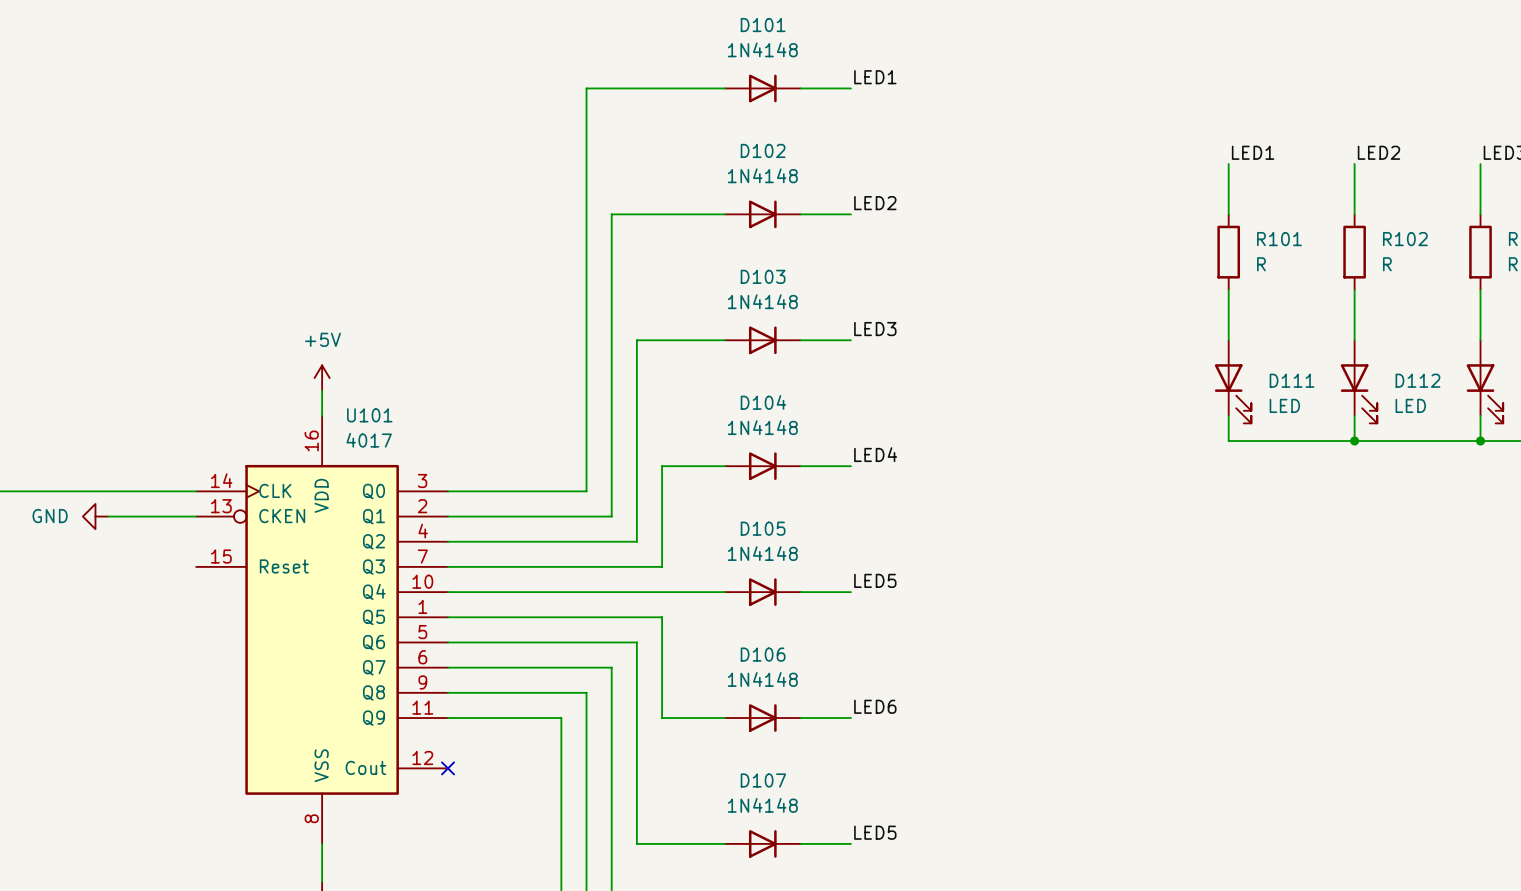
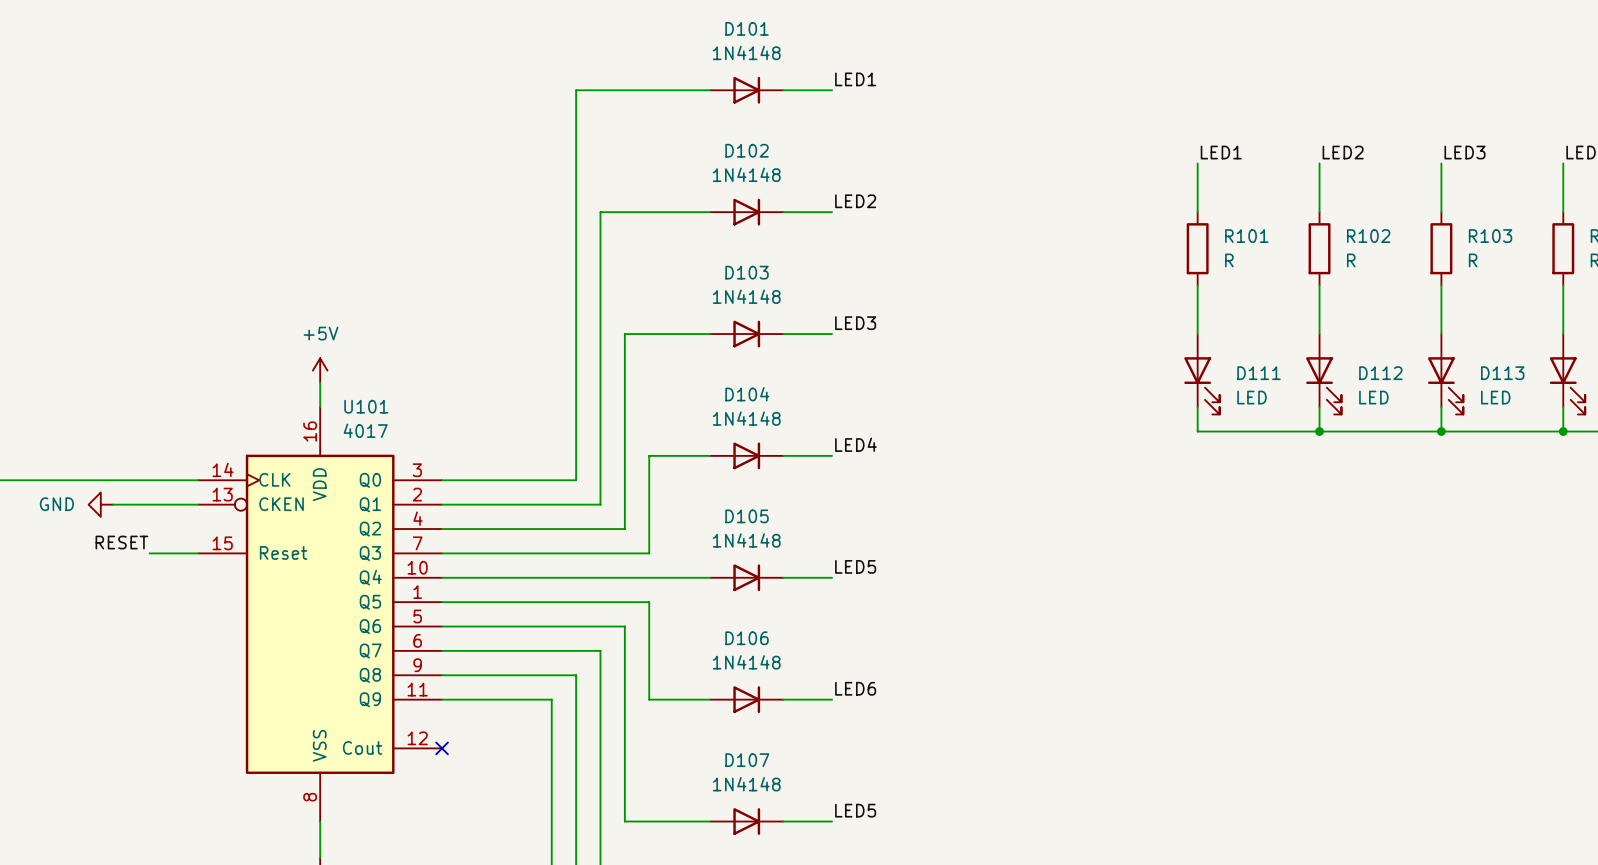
label: none -> RESET (121, 542)
wire: none -> (149, 553) (198, 553)

